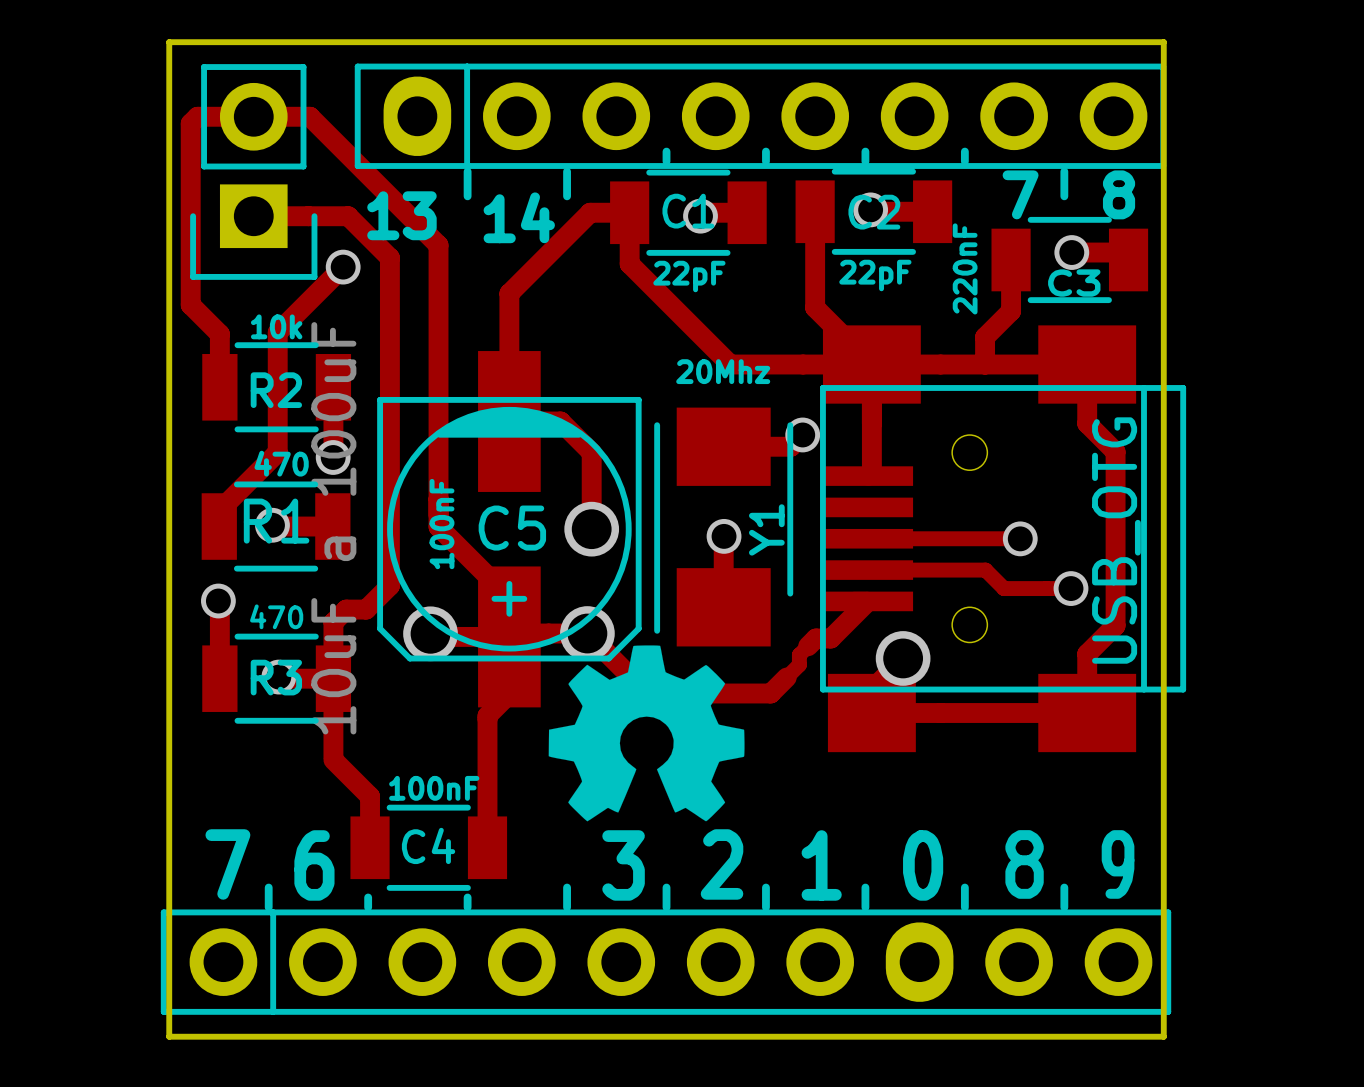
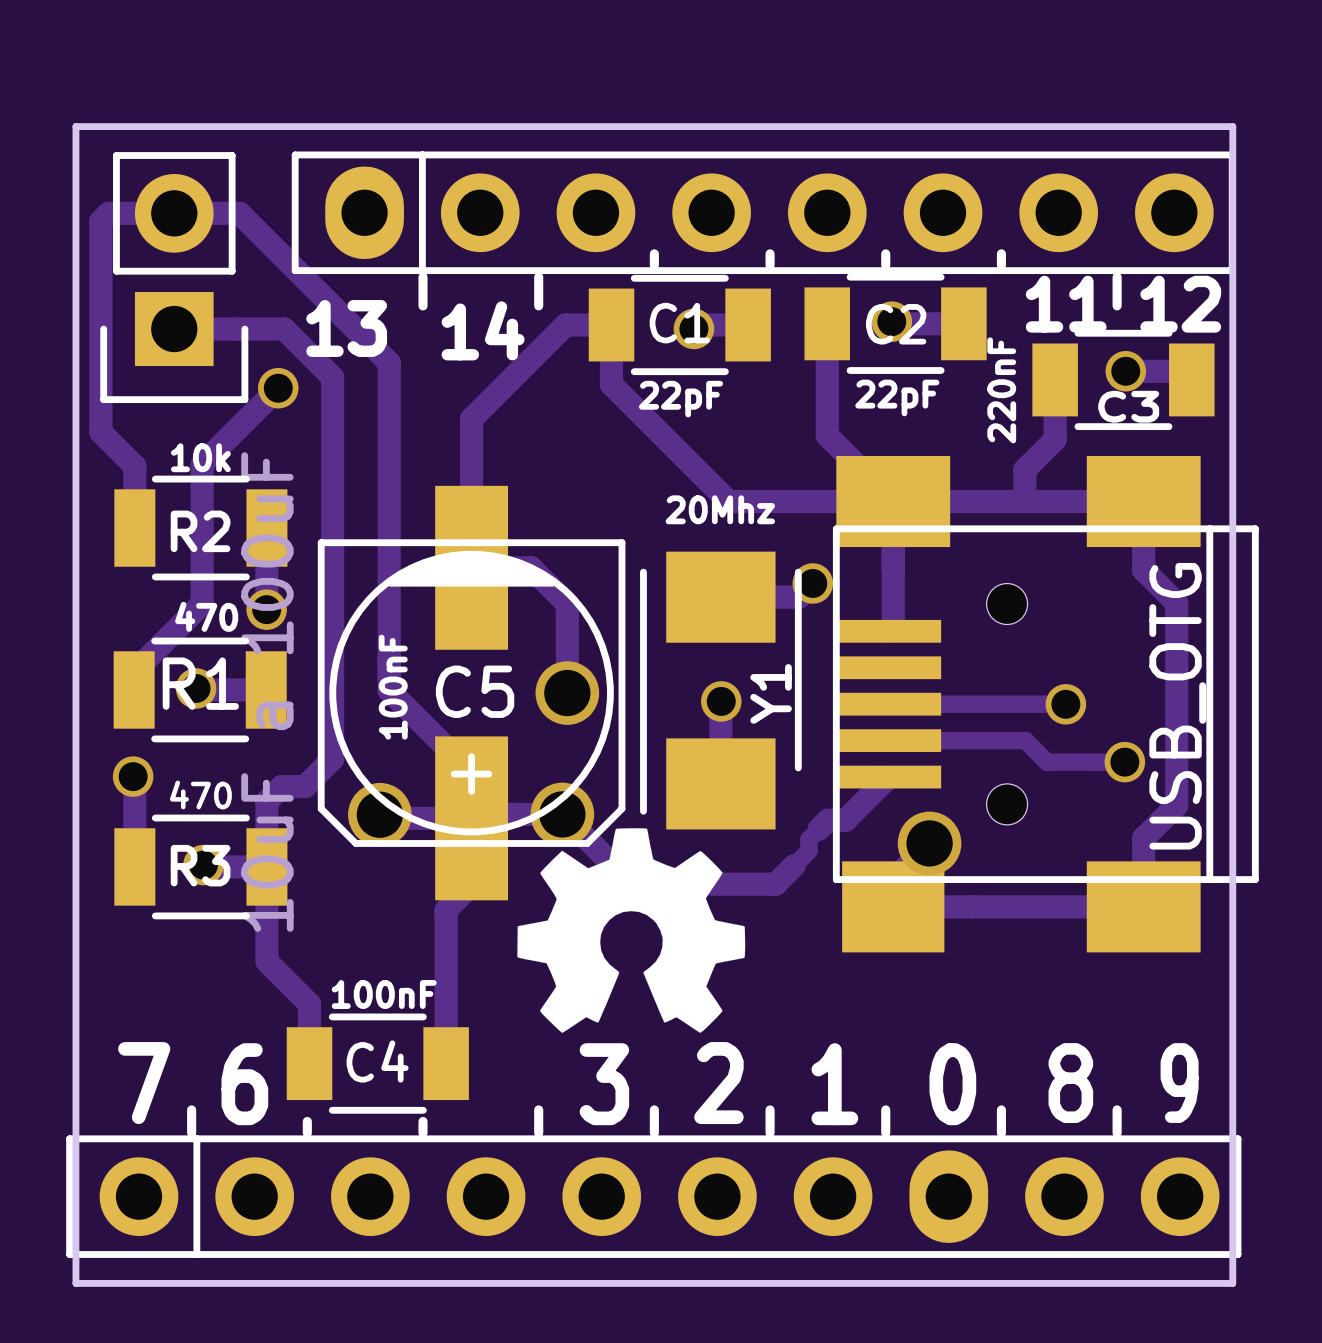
text: 7 (1020, 194) -> 11 (1066, 304)
text: 8 (1119, 194) -> 12 (1180, 304)

